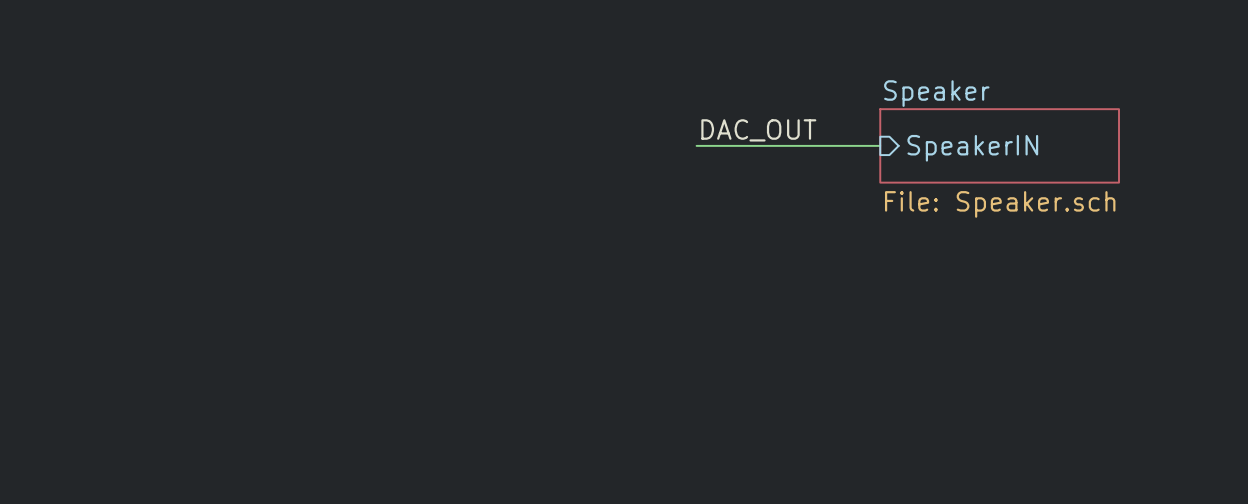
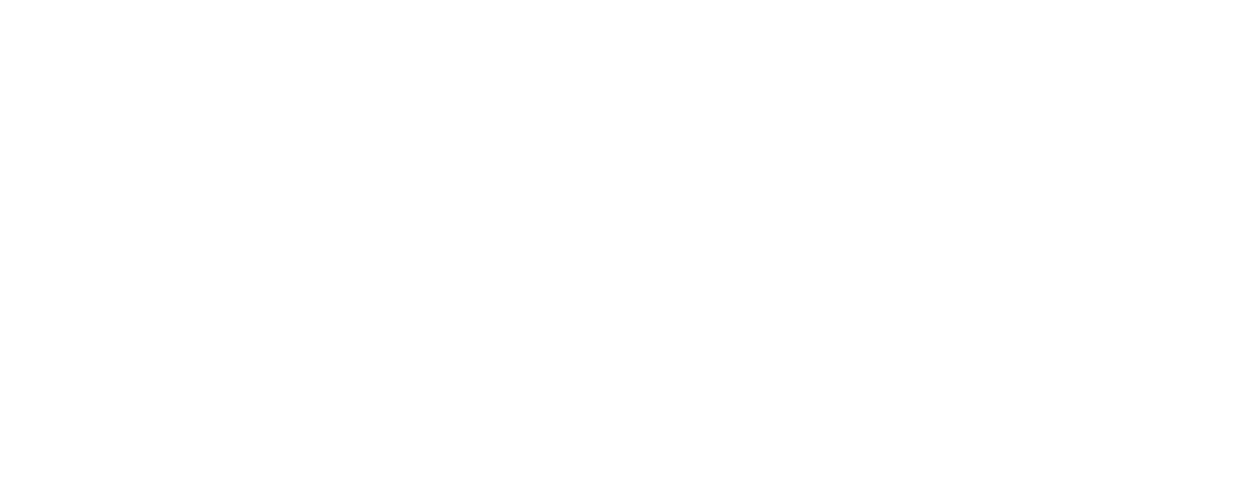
label: DAC_OUT (758, 130) -> none
wire: (696, 145) (880, 145) -> none
sheet Speaker: File: Speaker.sch (999, 145) -> none
sheet pin: SpeakerIN (972, 148) -> none

